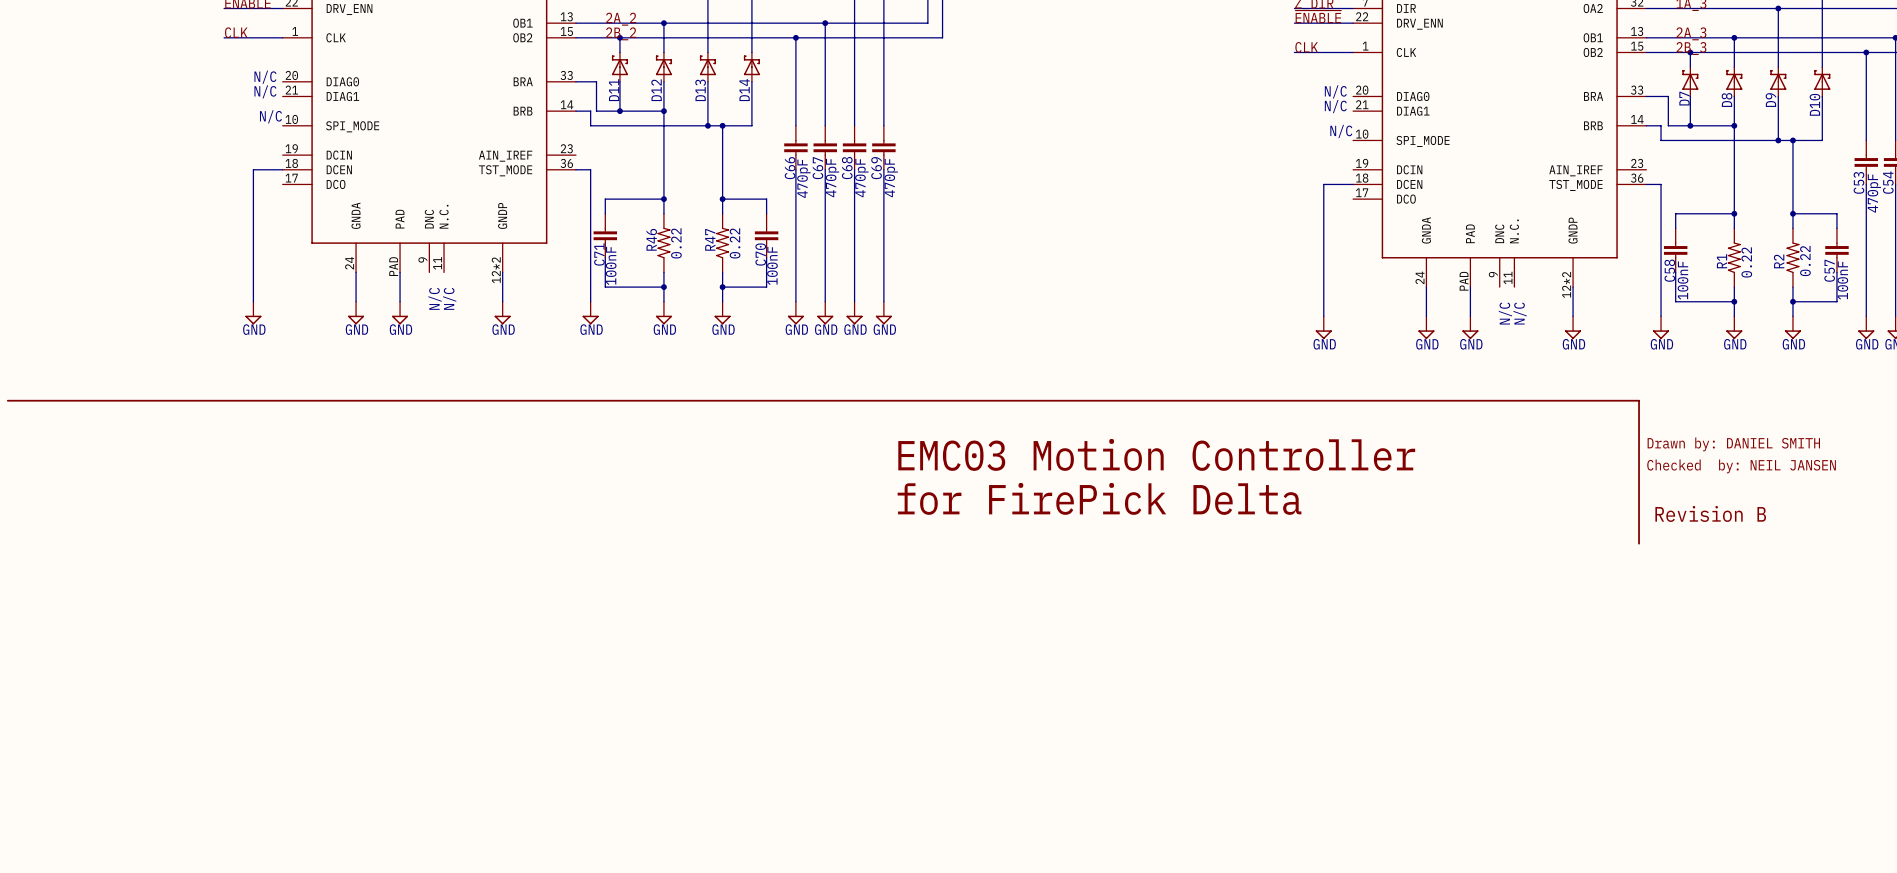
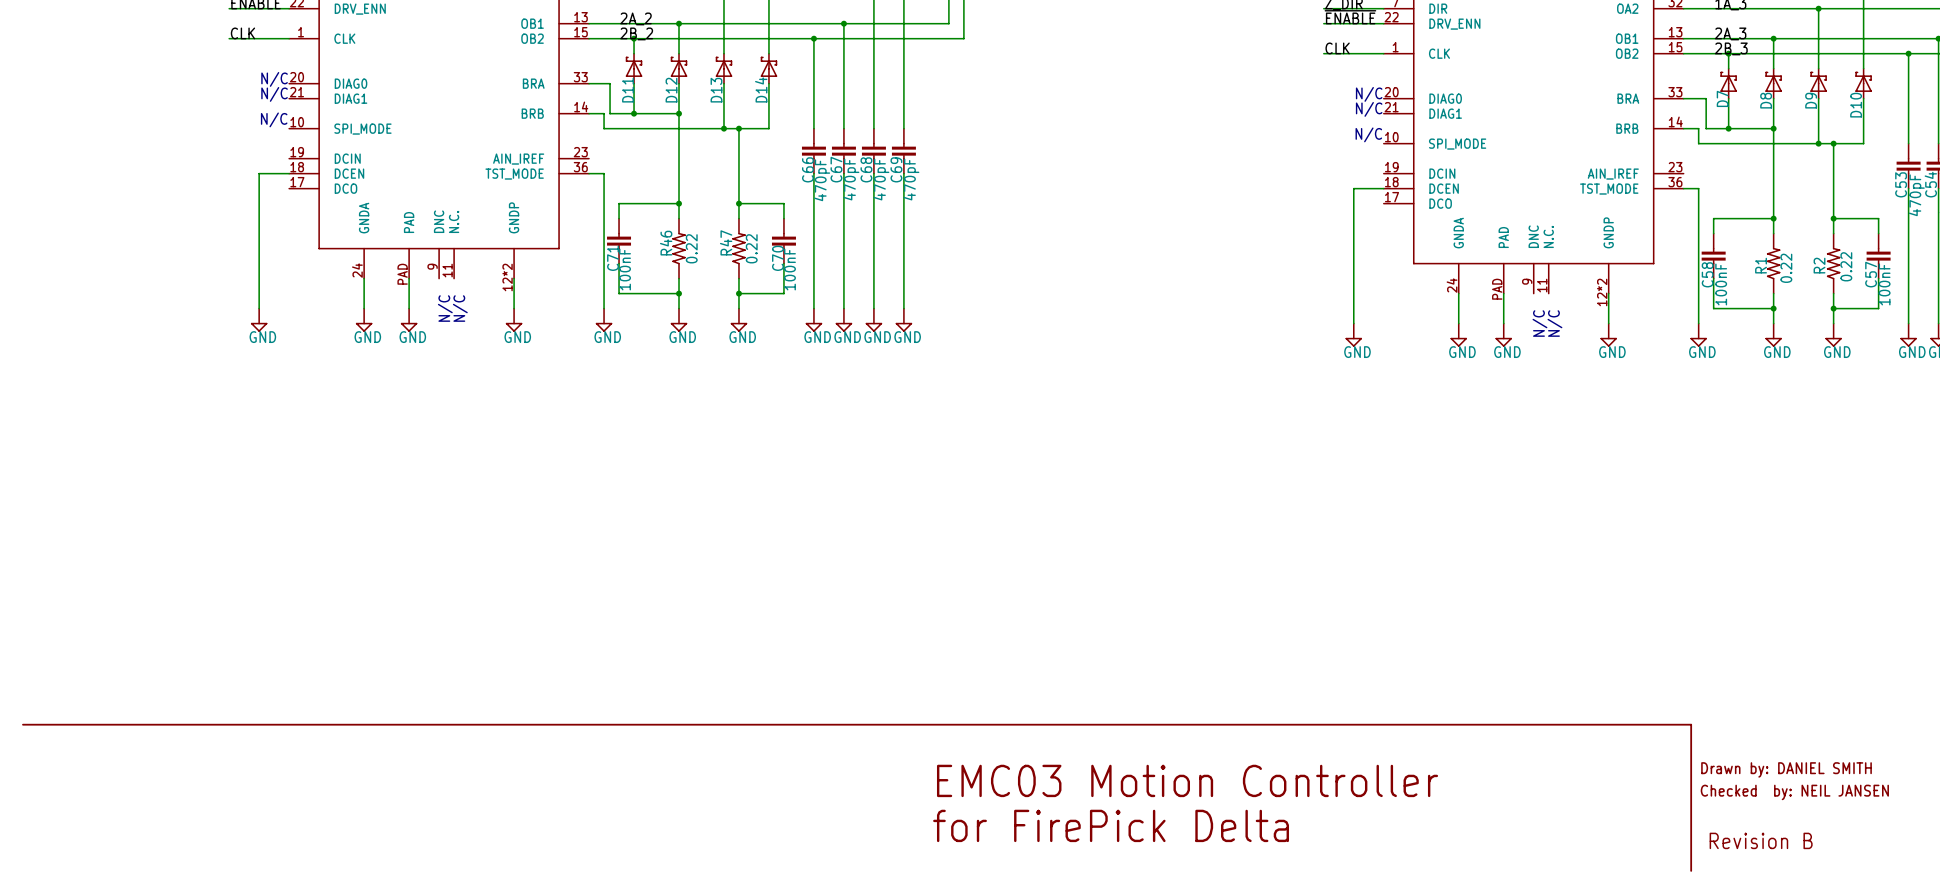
line: (7, 400) (1639, 400) (1639, 543) -> none
text: Drawn by: DANIEL SMITH (1733, 444) -> none
text: EMC03 Motion Controller (1156, 454) -> none
text: Checked by: NEIL JANSEN (1741, 466) -> none
text: for FirePick Delta (1099, 498) -> none
text: Revision B (1710, 513) -> none
line: none -> (22, 724) (1691, 724) (1691, 870)
text: none -> Drawn by: DANIEL SMITH (1786, 769)
text: none -> EMC03 Motion Controller (1187, 780)
text: none -> Checked by: NEIL JANSEN (1794, 792)
text: none -> for FirePick Delta (1111, 825)
text: none -> Revision B (1761, 840)

